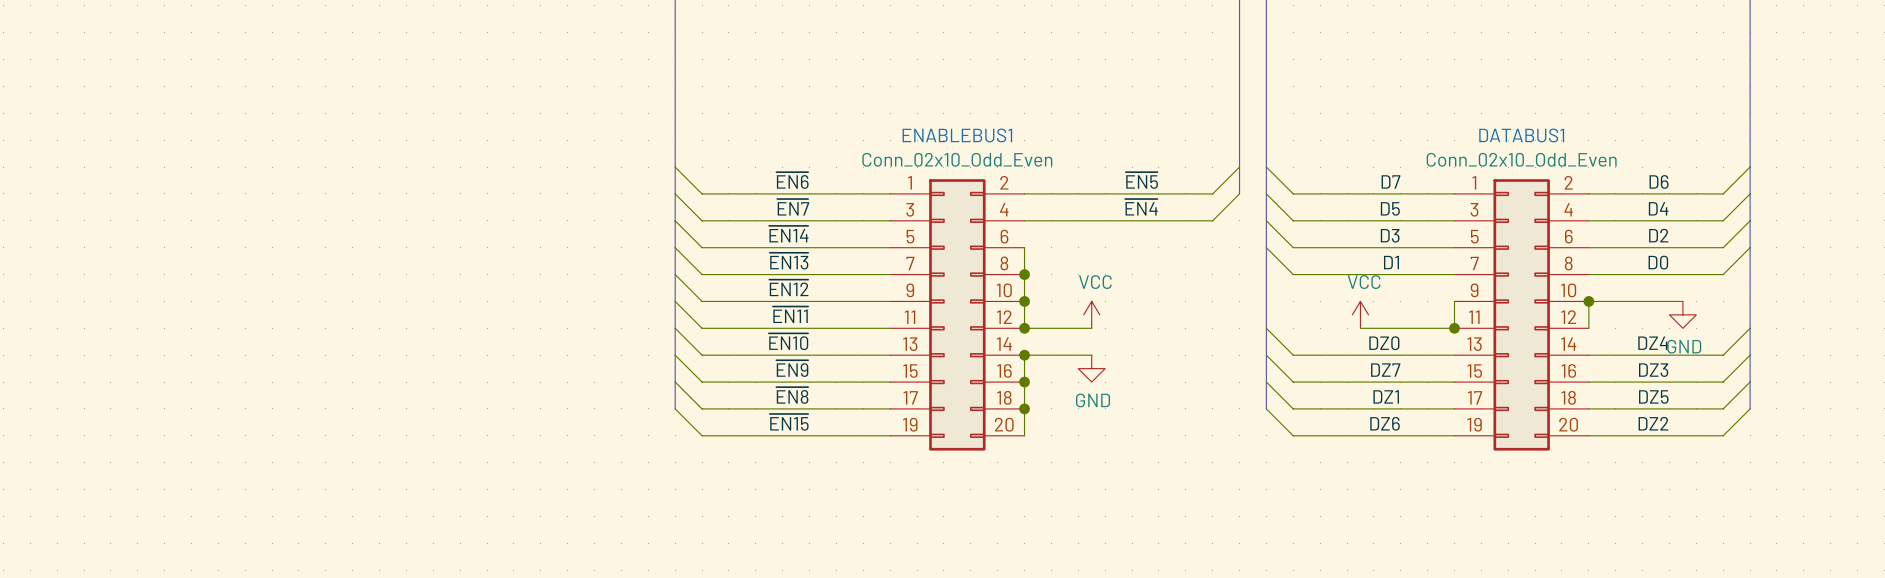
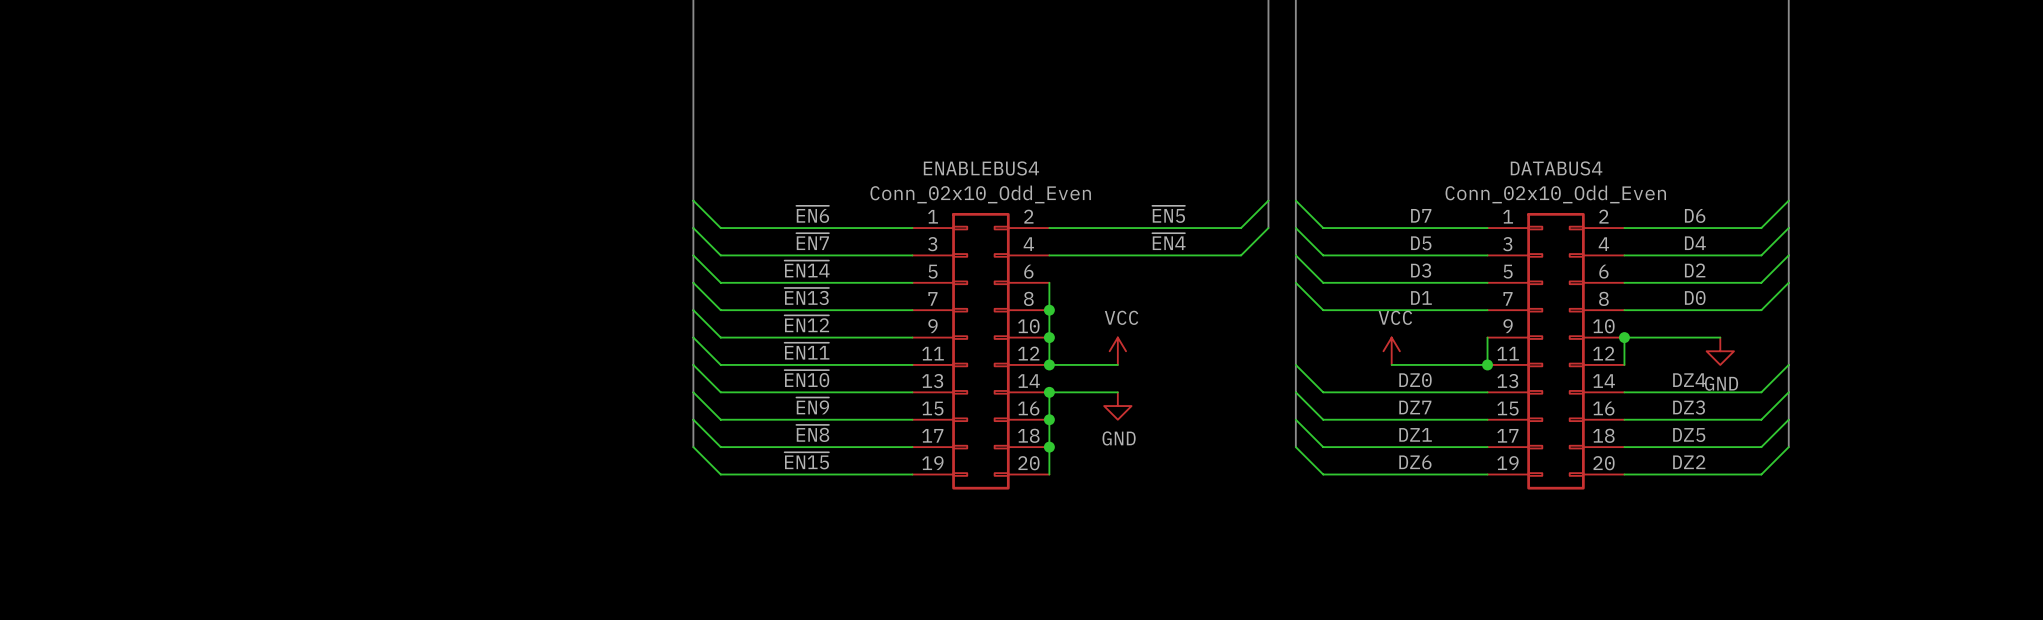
ENABLEBUS1 name: ENABLEBUS1 (957, 135) -> ENABLEBUS4 (981, 168)
DATABUS1 name: DATABUS1 (1521, 135) -> DATABUS4 (1556, 168)

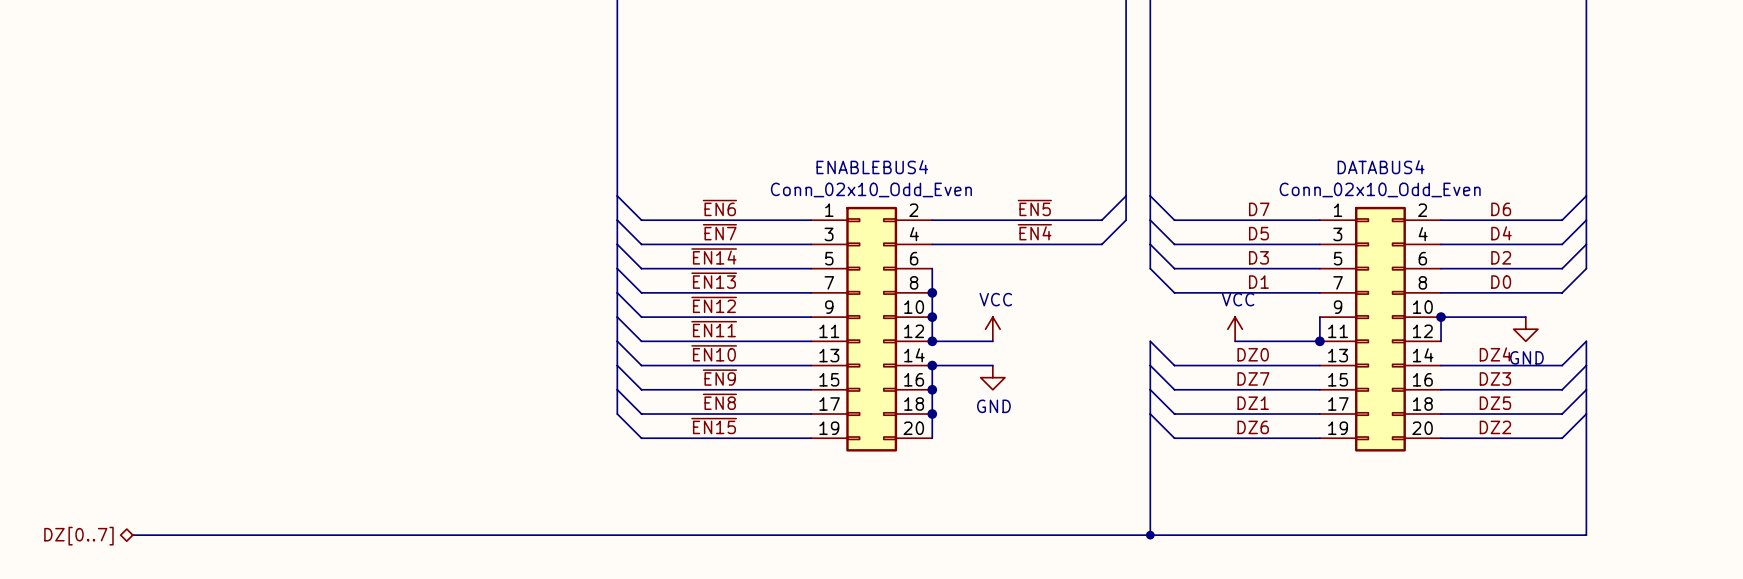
bus: (1295, 282) (1295, 364) -> none
bus: (1788, 282) (1788, 364) -> none
bus: none -> (1150, 414) (1150, 535)
bus: none -> (1586, 414) (1586, 535) (132, 535)
hierarchical label: none -> DZ[0..7] (78, 536)
junction: none -> (1150, 535)

